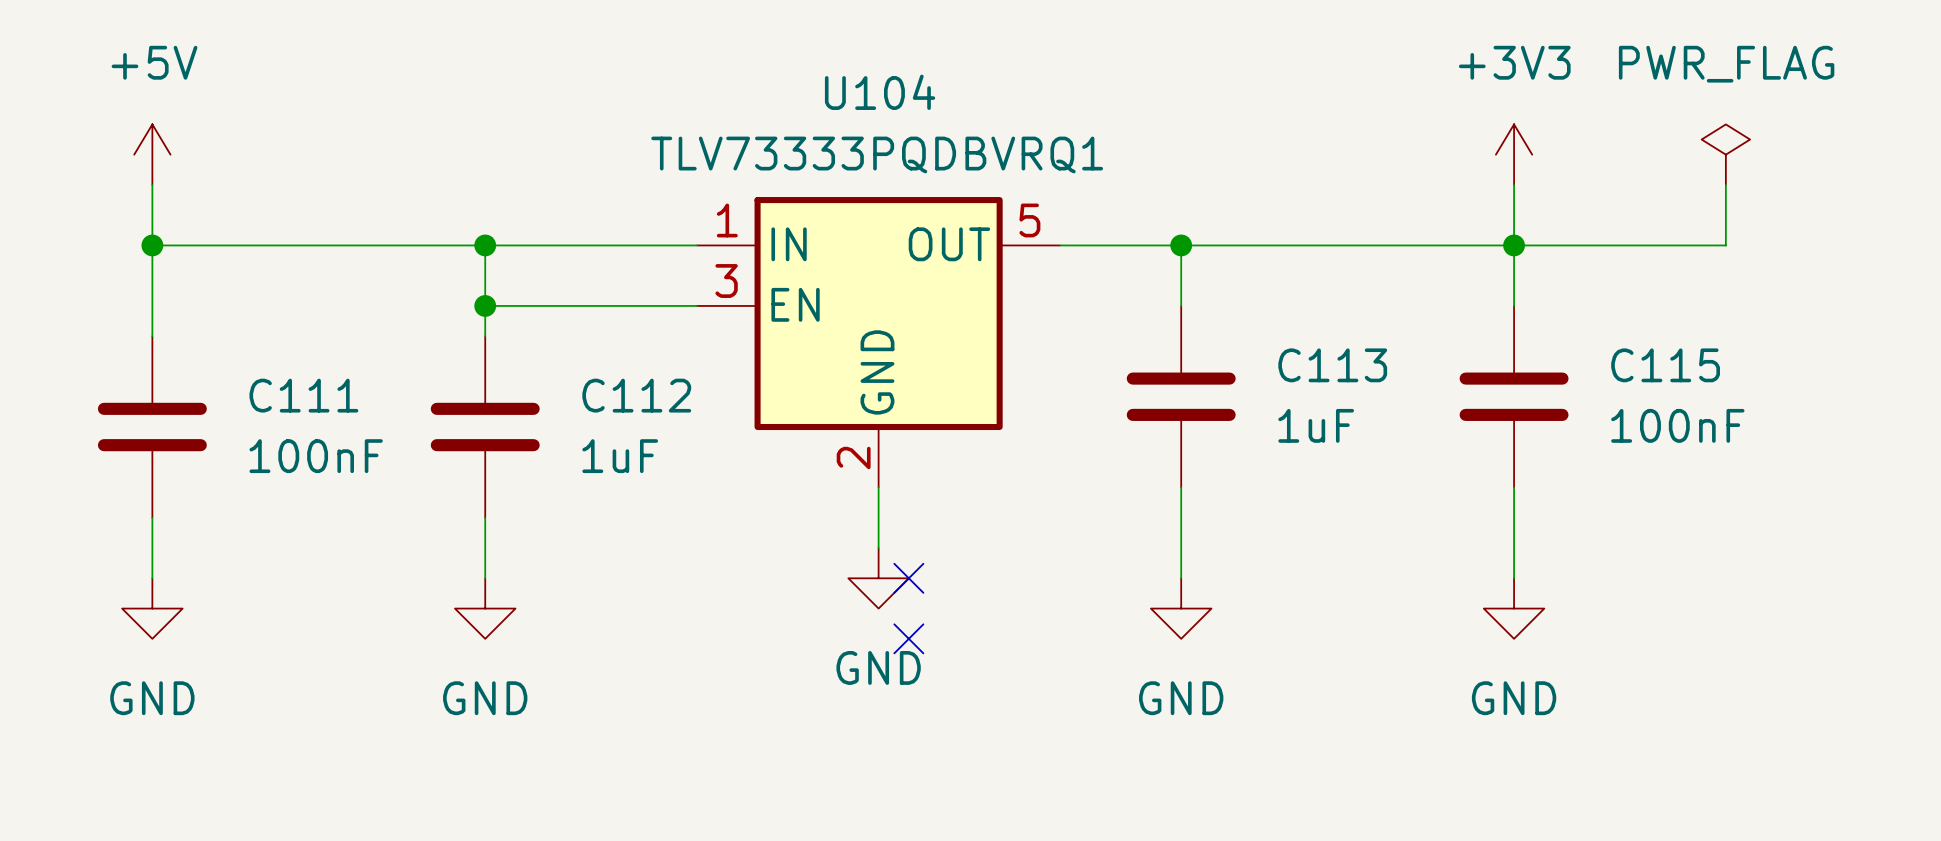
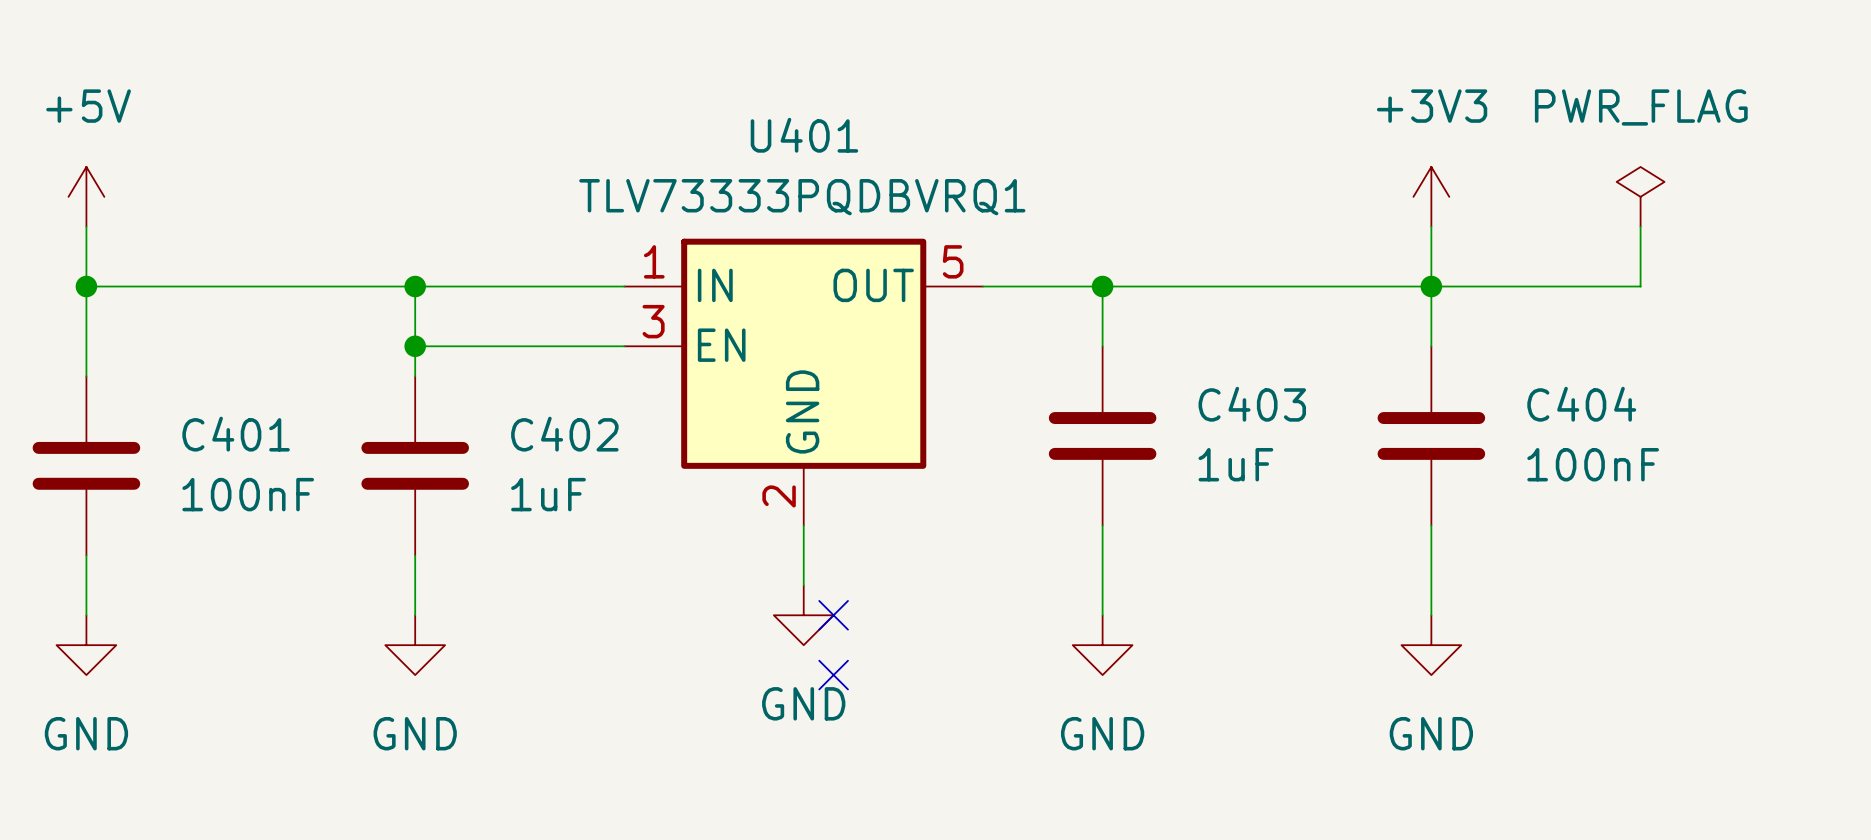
U104 name: U104 (880, 92) -> U401 (804, 135)
C113 name: C113 (1332, 365) -> C403 (1252, 404)
C115 name: C115 (1665, 365) -> C404 (1581, 404)
C111 name: C111 (303, 395) -> C401 (236, 434)
C112 name: C112 (636, 395) -> C402 (564, 434)

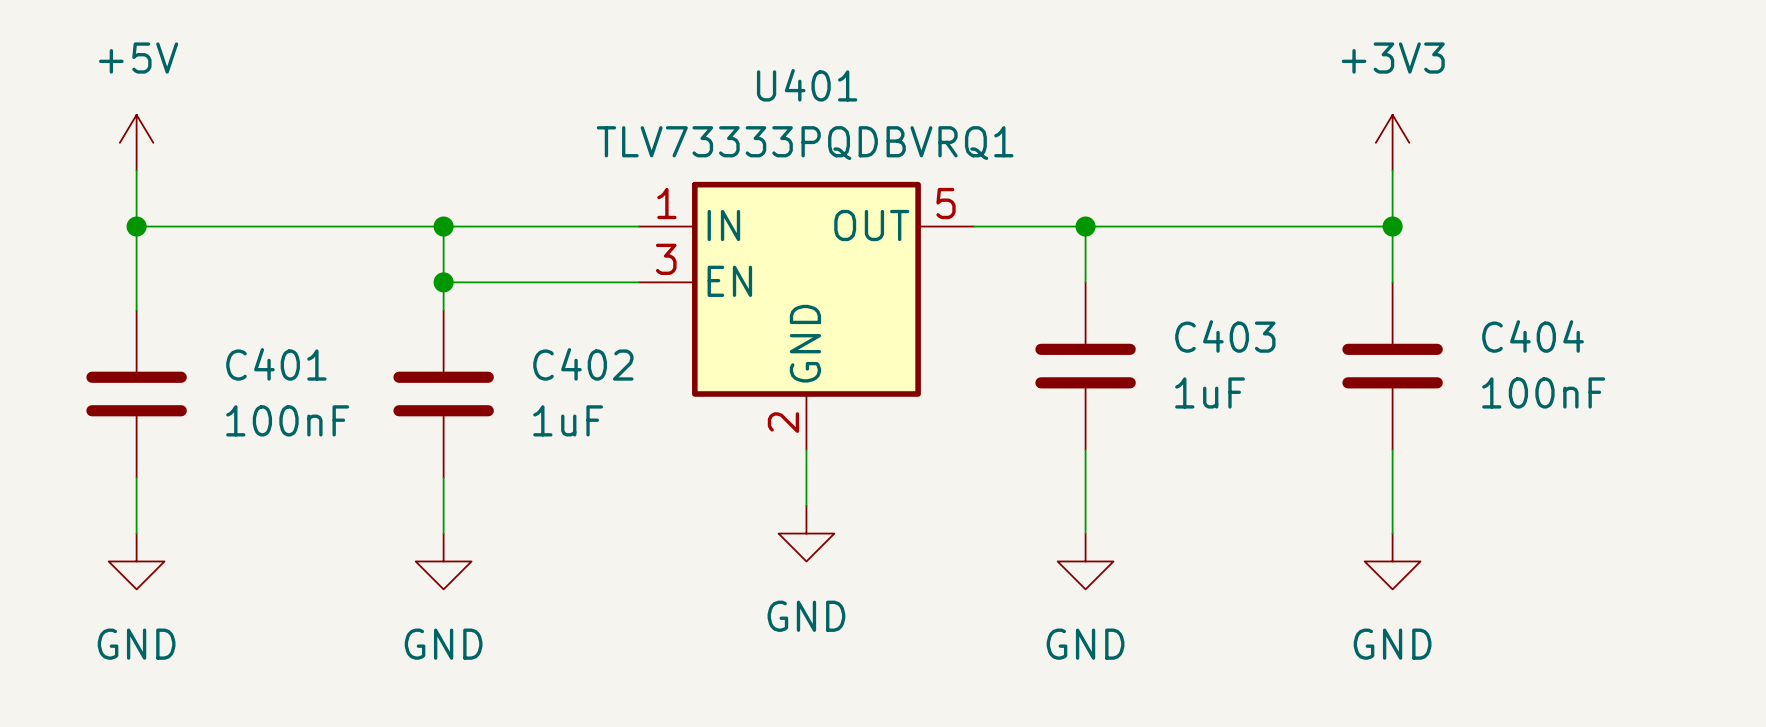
power symbol: PWR_FLAG (1640, 196) -> none
wire: (1640, 226) (1640, 286) (1431, 286) -> none
no-connect mark: (833, 615) -> none
no-connect mark: (833, 675) -> none

